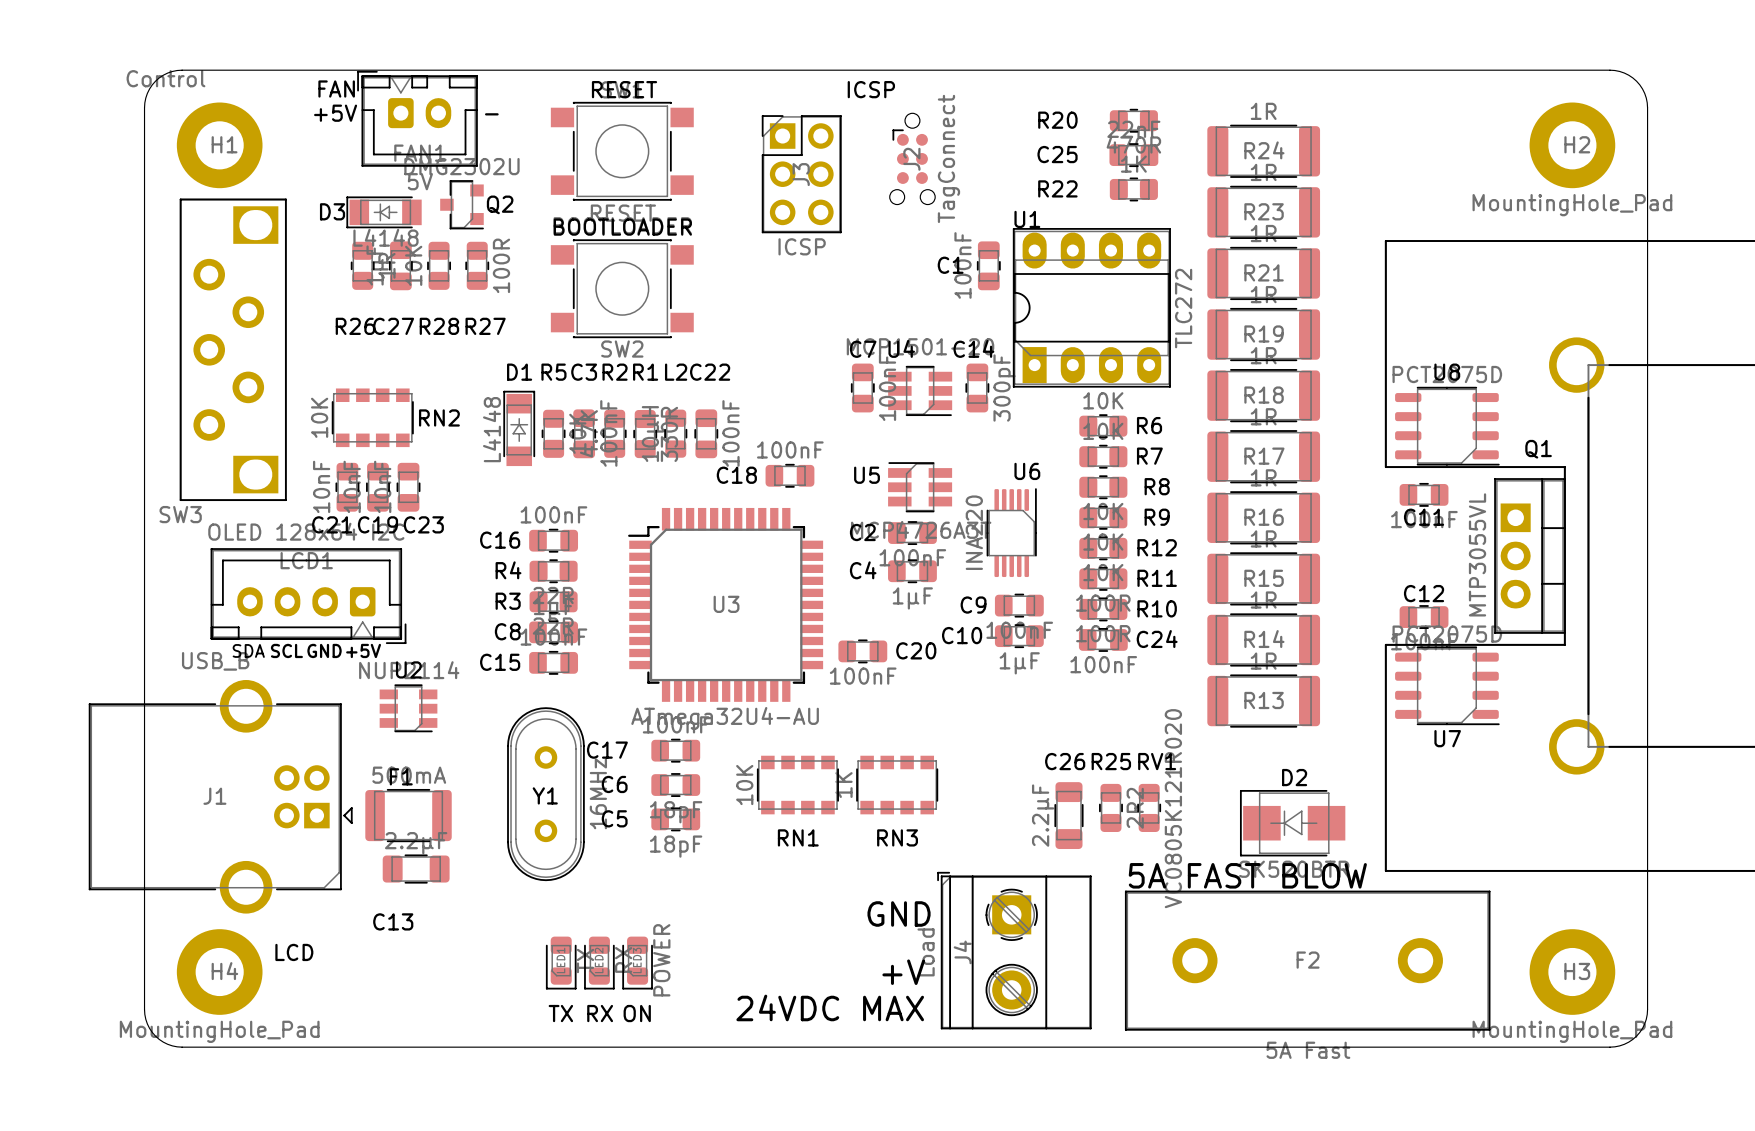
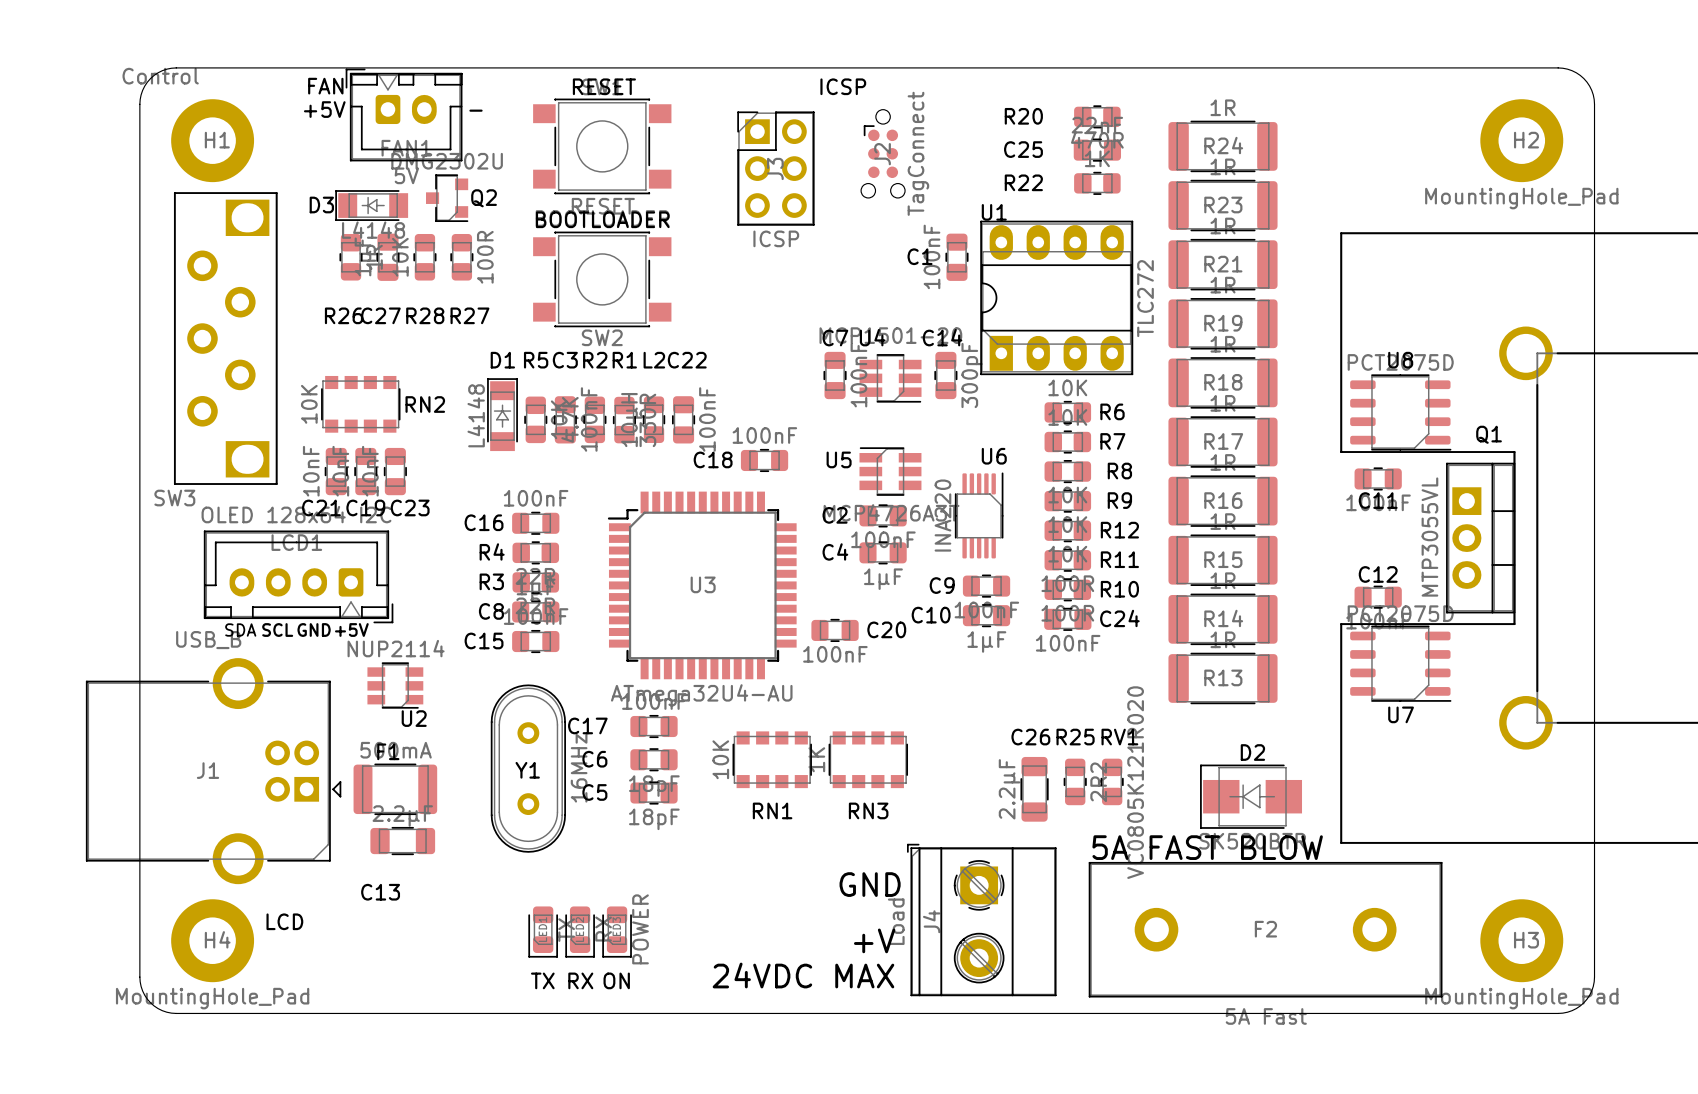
U2 name position: U2 (408, 669) -> U2 (414, 718)

